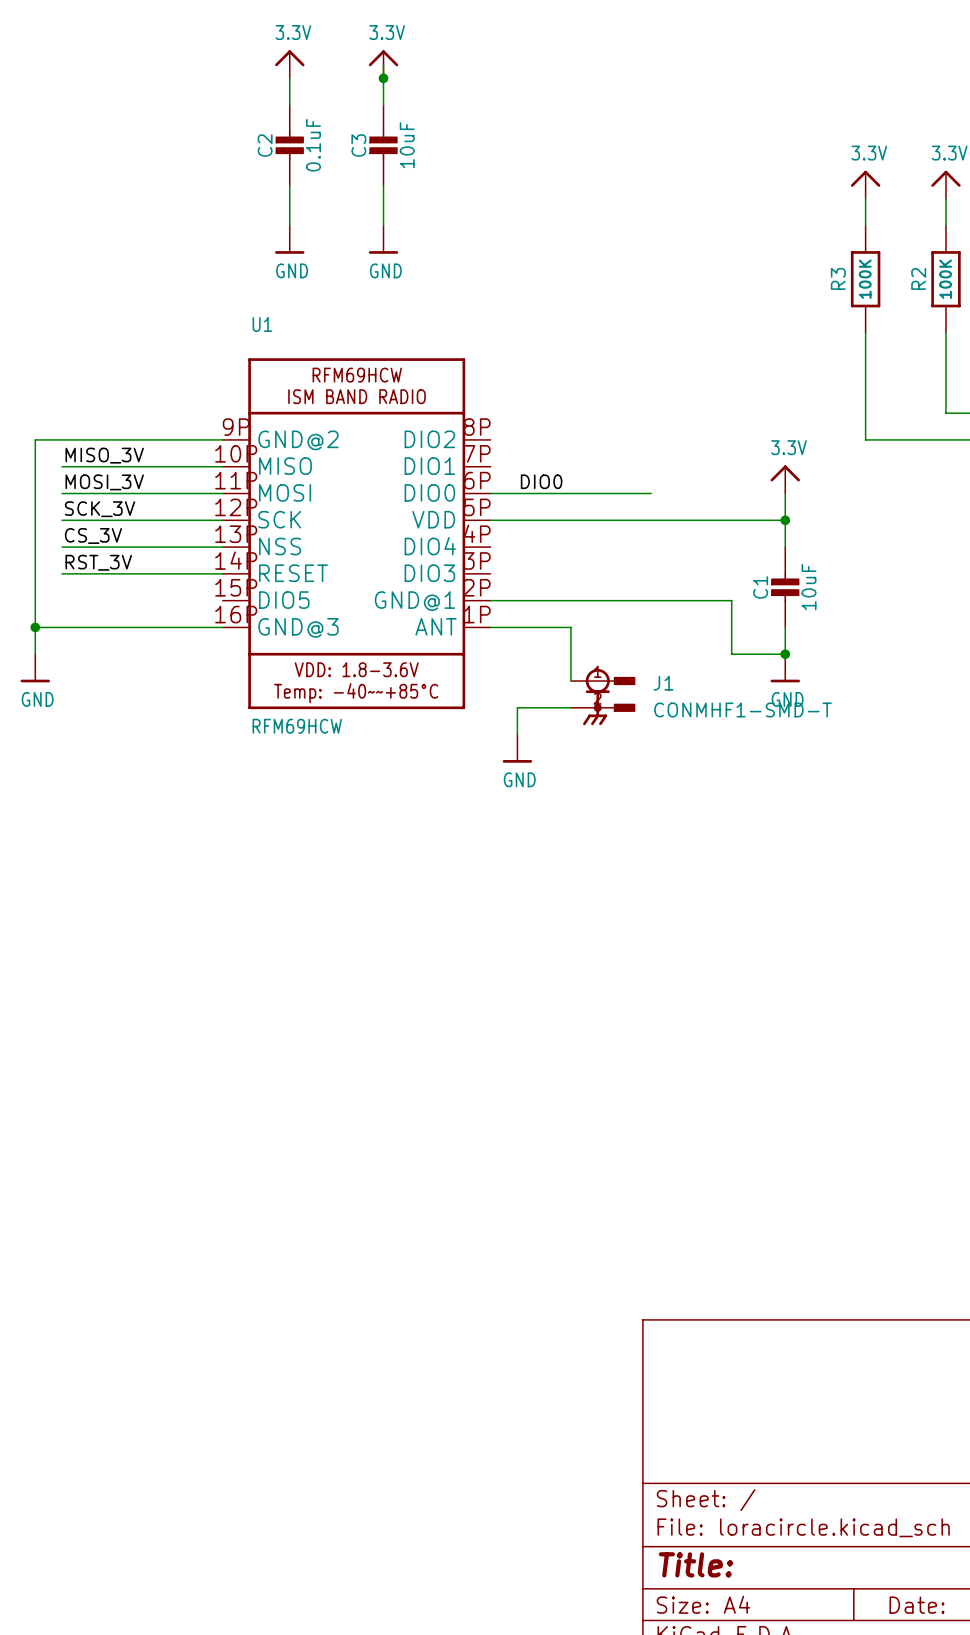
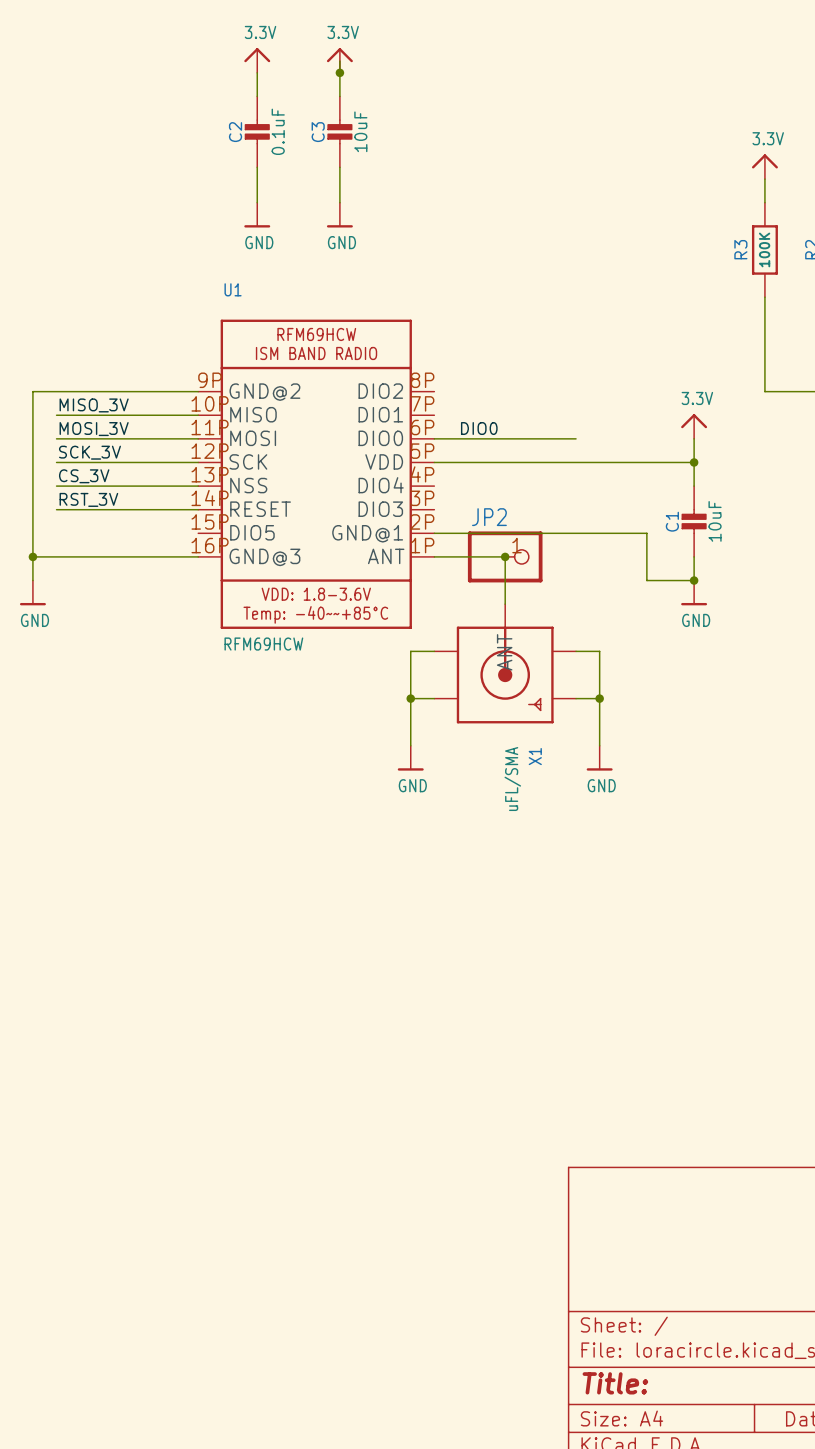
JP2: none -> (505, 556)
junction: none -> (505, 556)
J1: CONMHF1-SMD-T (603, 697) -> none
wire: none -> (434, 651) (410, 651) (410, 745)
wire: none -> (576, 651) (599, 651) (599, 745)
power symbol: GND (517, 748) -> none
X1: none -> uFL/SMA (505, 663)
wire: none -> (410, 698) (434, 698)
junction: none -> (410, 698)
wire: none -> (576, 698) (599, 698)
junction: none -> (599, 698)
power symbol: none -> GND (410, 758)
power symbol: none -> GND (599, 758)

